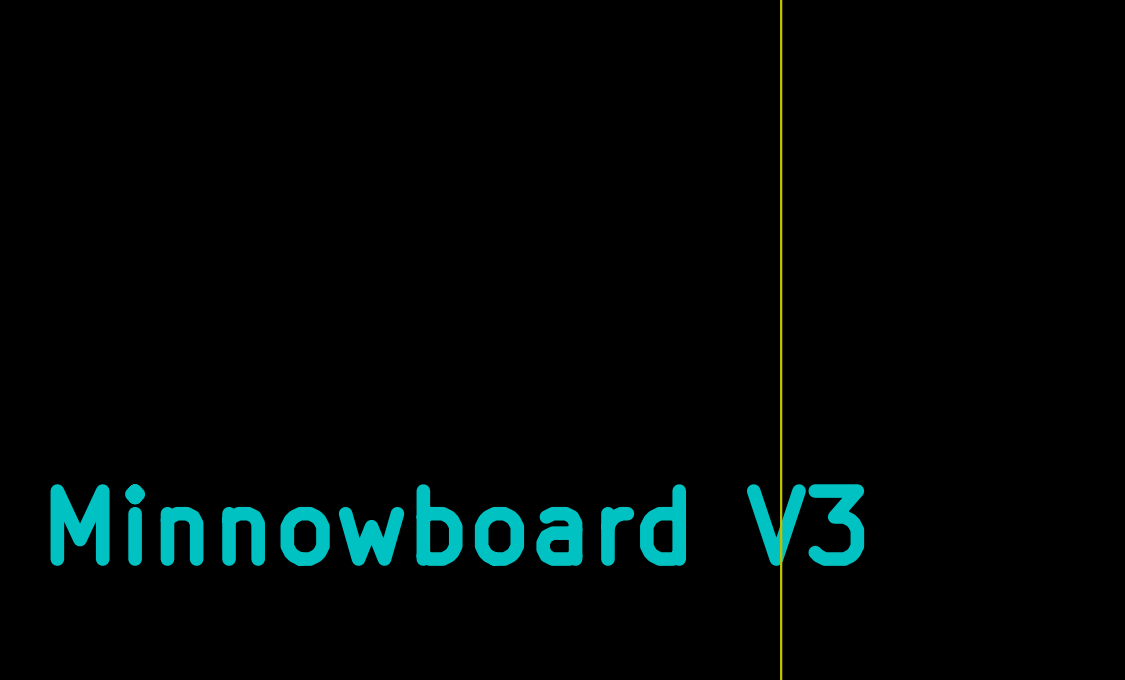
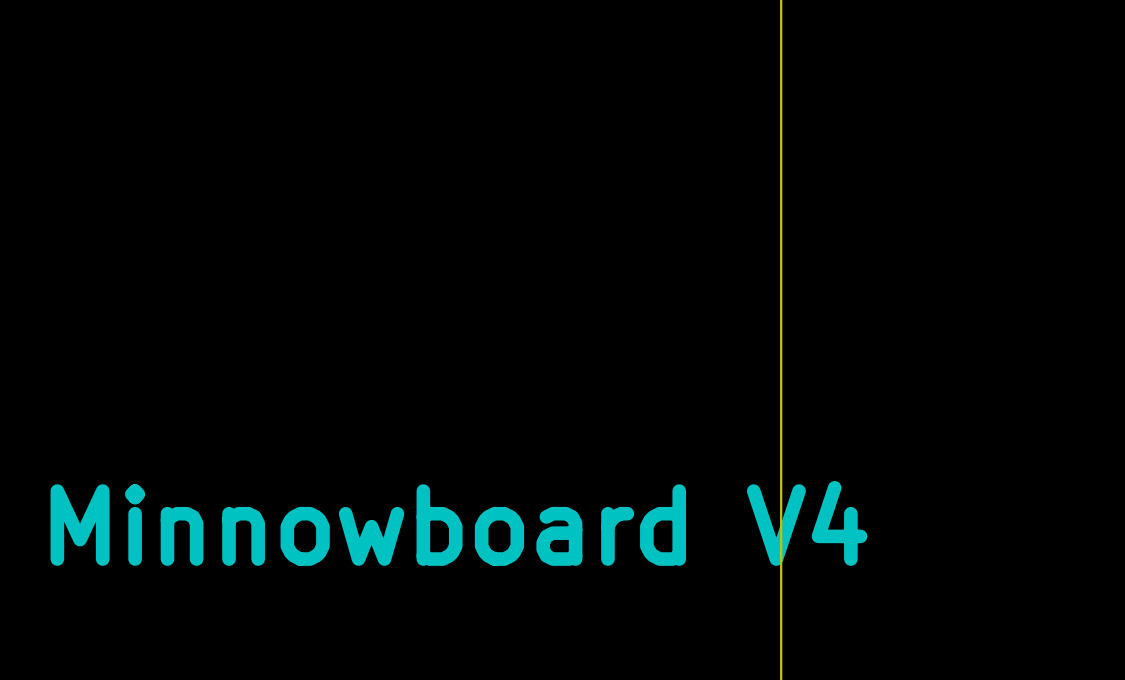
text: Minnowboard V3 (457, 525) -> Minnowboard V4 (458, 523)

